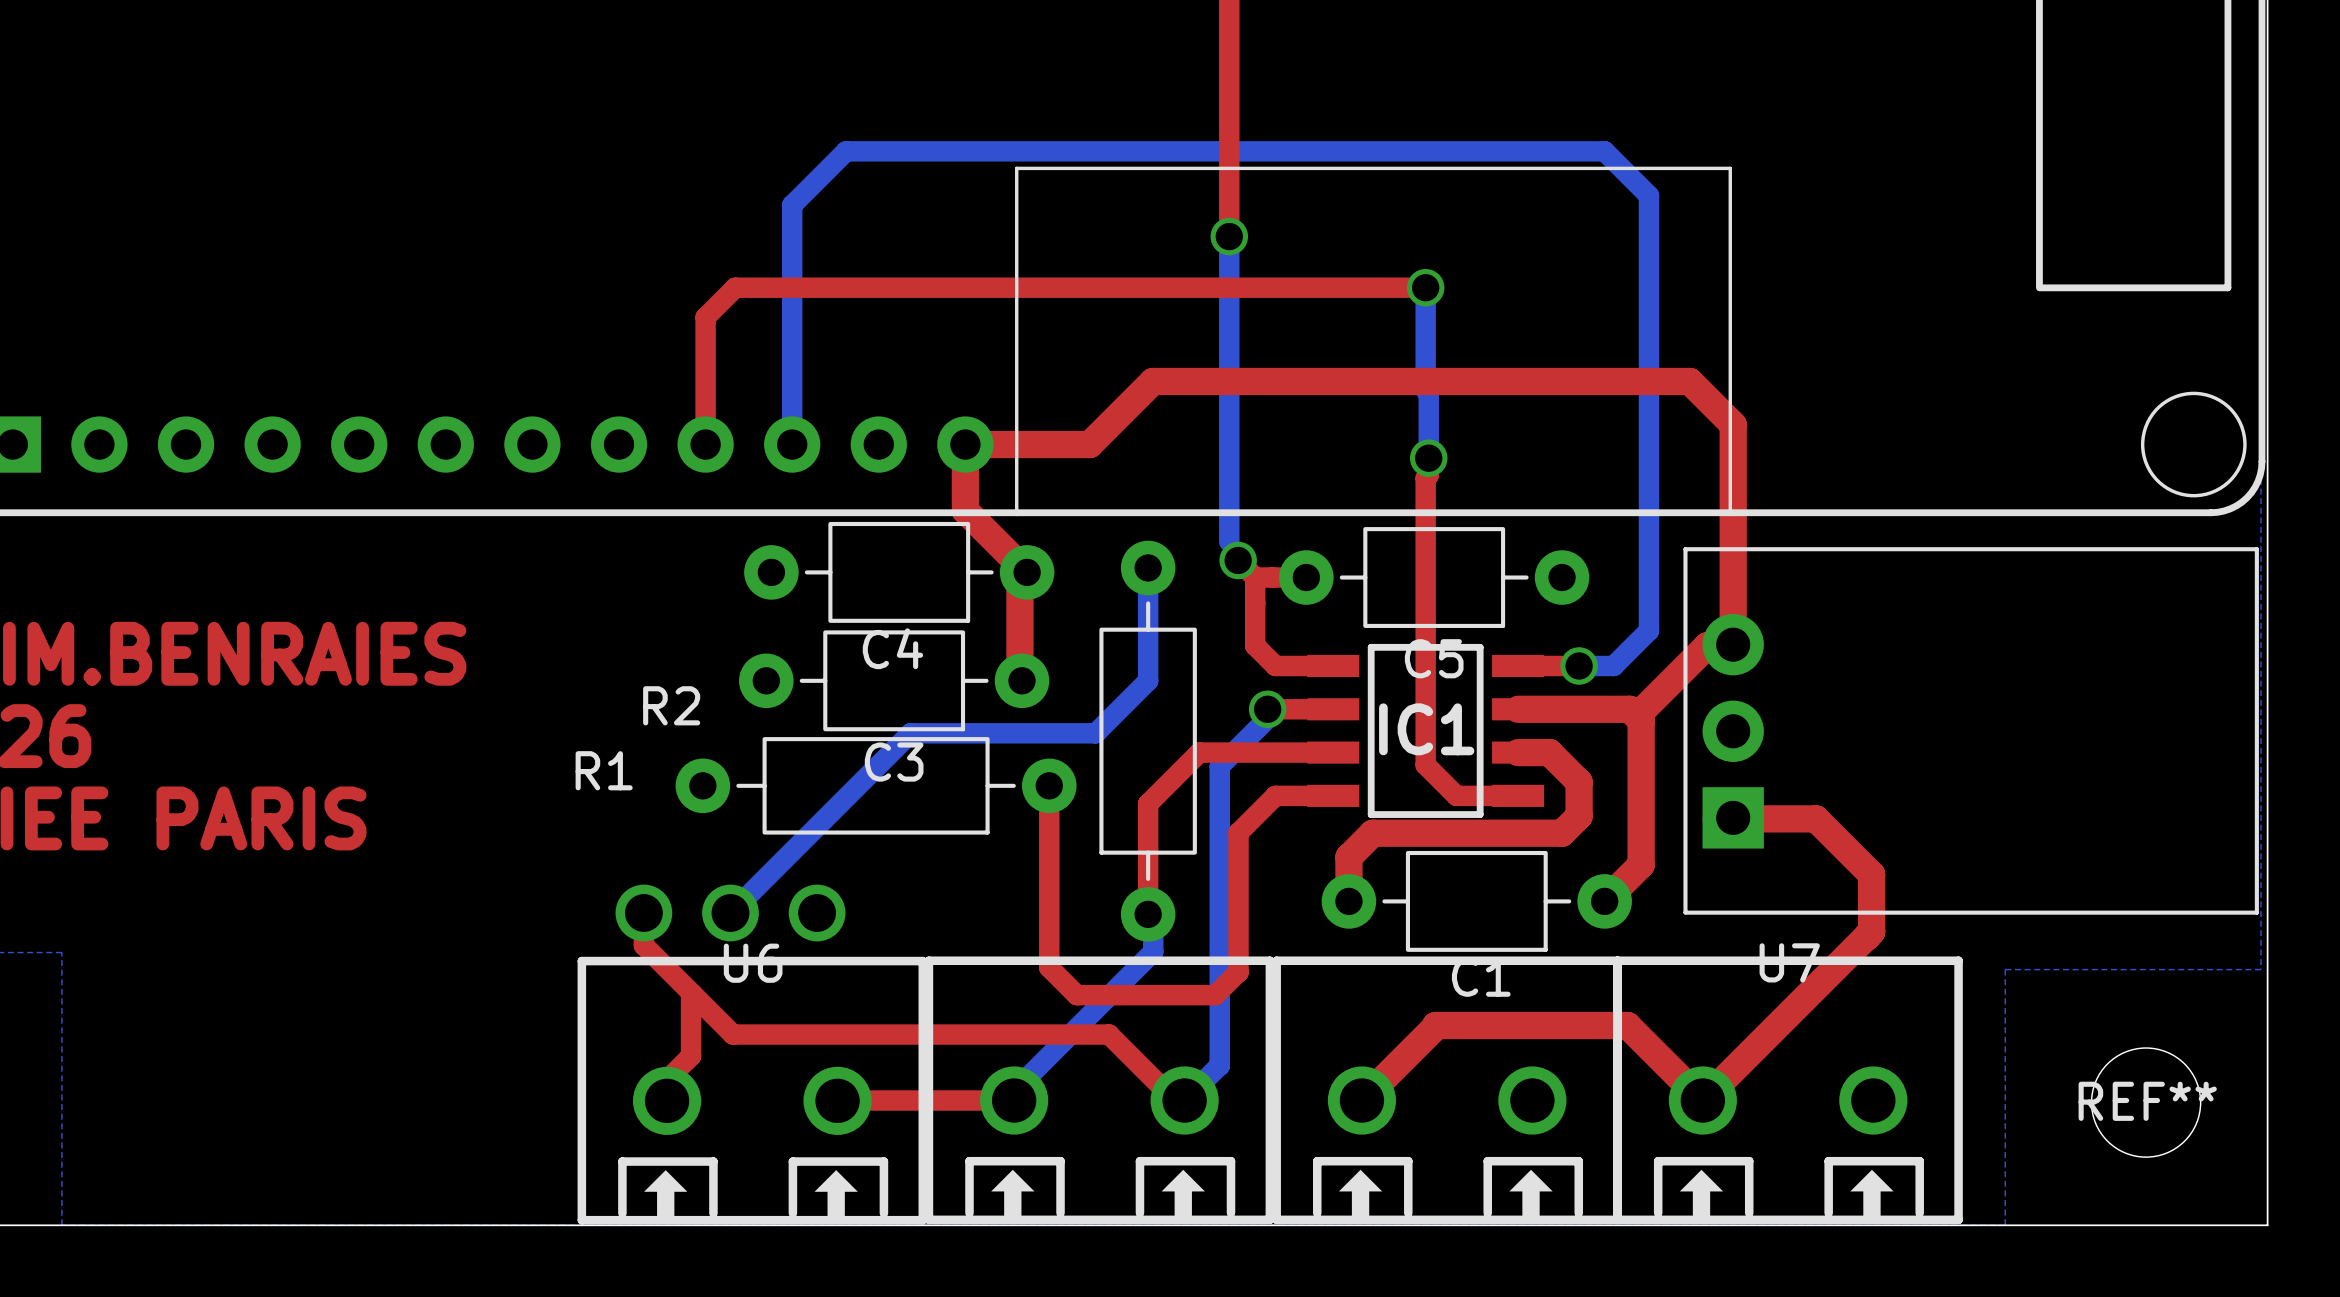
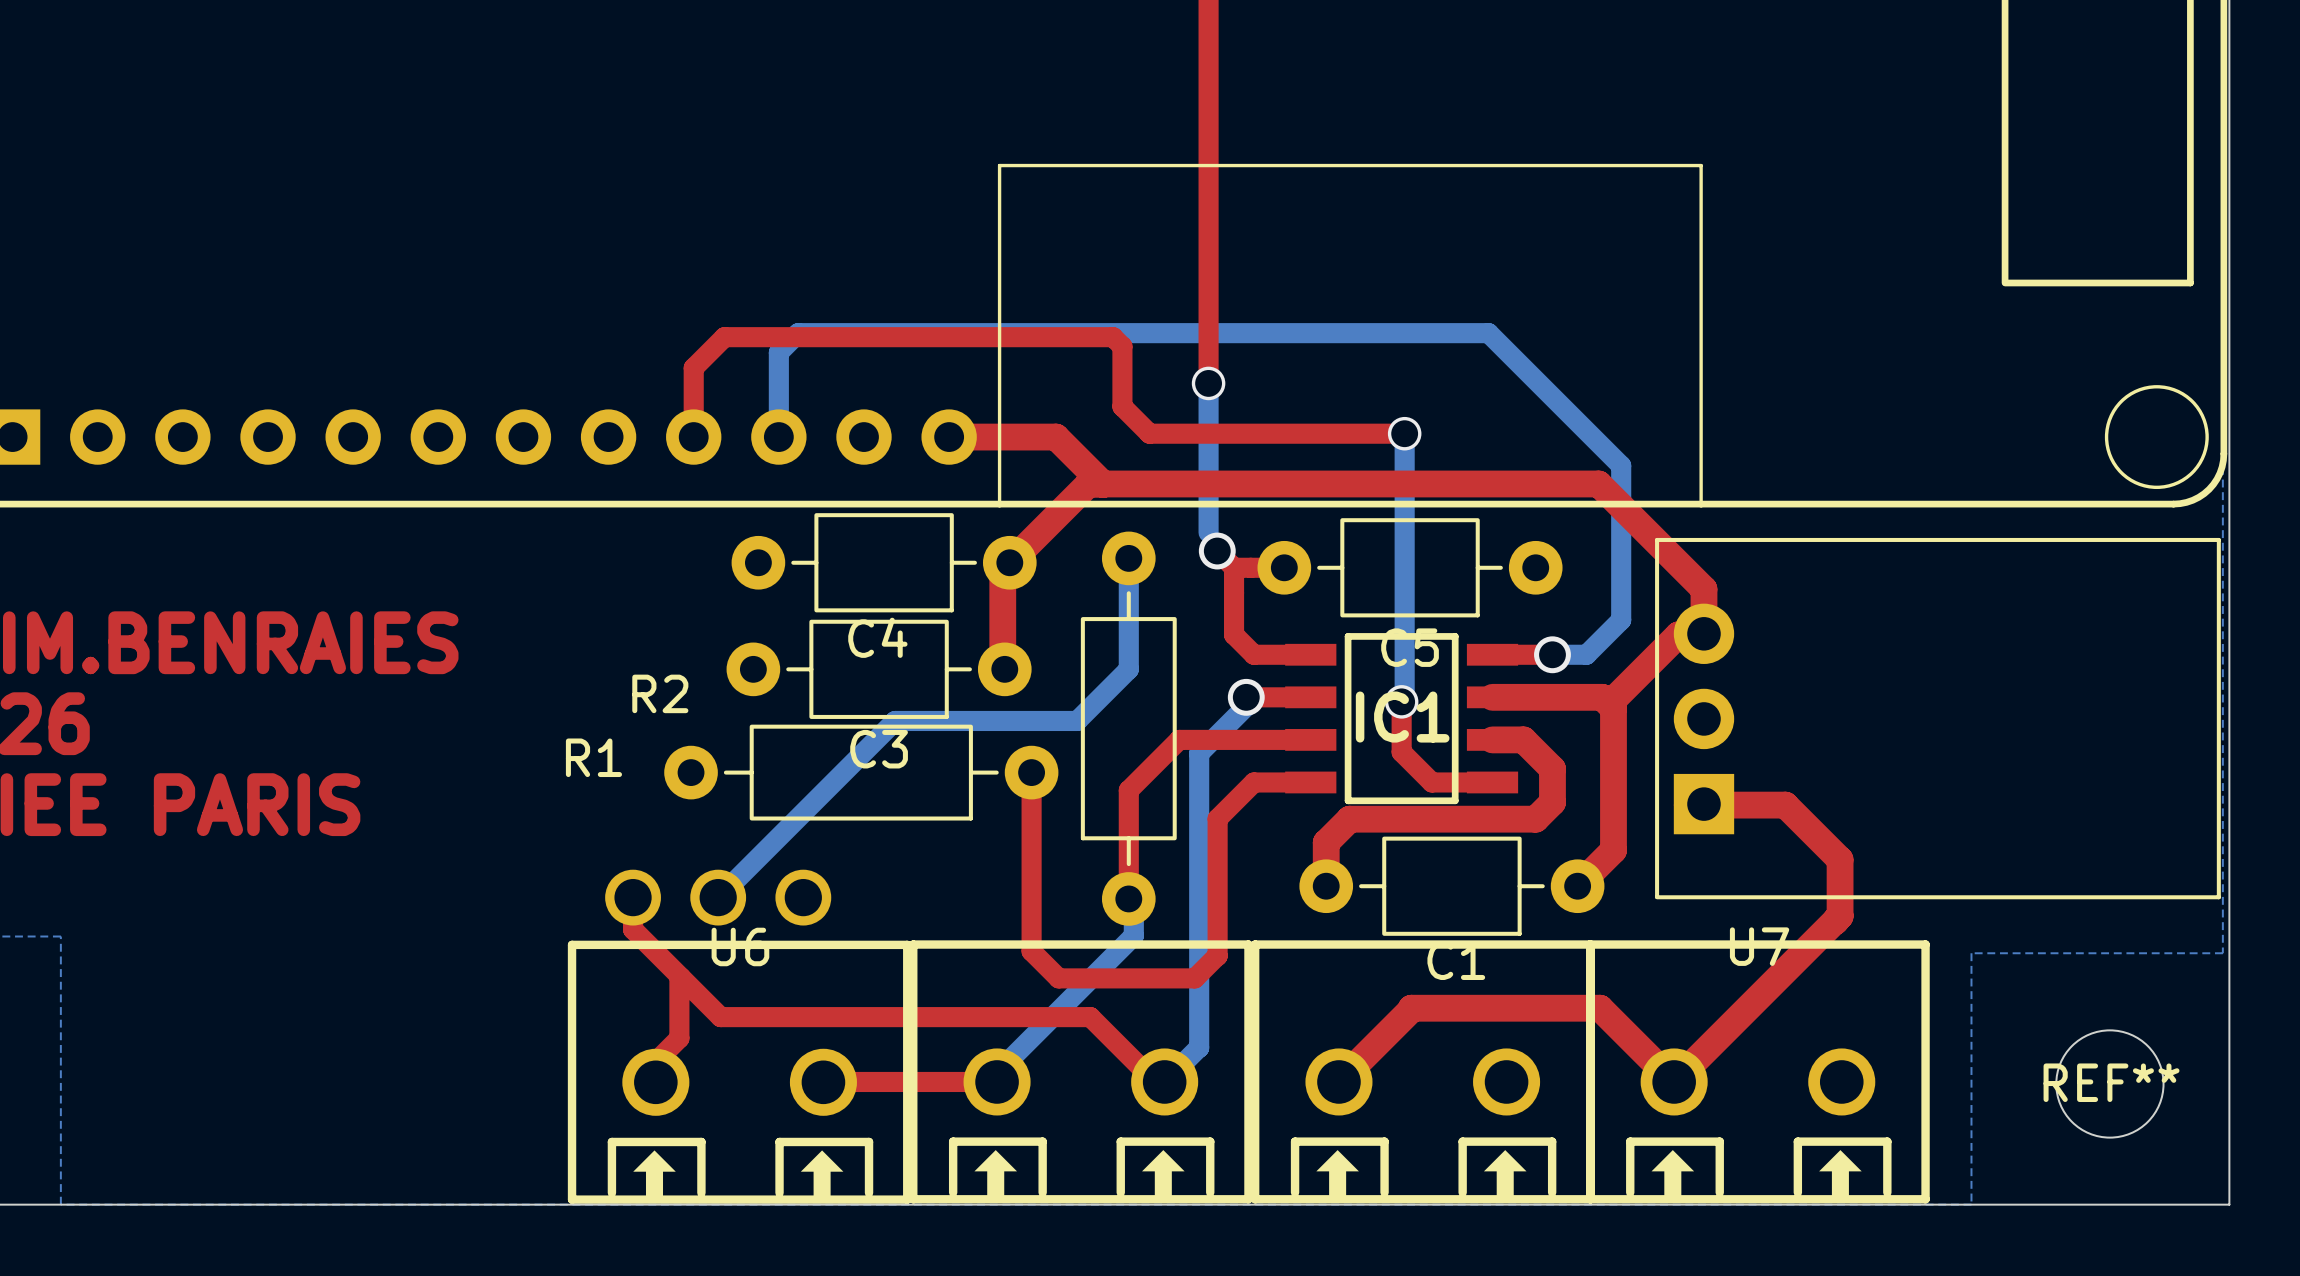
top track: none -> (1208, 232) (1208, 383)
bottom track: (1229, 236) (1229, 390) -> none
via: (1229, 236) -> none
top track: (1425, 287) (735, 287) (705, 317) (705, 374) -> (1404, 433) (1149, 433) (1122, 406) (1122, 346) (1113, 337) (724, 337) (693, 368)
bottom track: (1425, 287) (1425, 390) (1428, 393) (1428, 441) -> none
via: (1425, 287) -> none
bottom track: (792, 358) (792, 205) (846, 151) (1604, 151) (1648, 195) (1648, 473) -> (778, 352) (798, 333) (1488, 333) (1621, 465)
via: none -> (1208, 383)
top track: (965, 444) (965, 510) (1027, 572) -> (1056, 437) (1103, 484) (1088, 484) (1009, 562)
top track: (1074, 444) (1089, 444) (1152, 381) (1689, 381) (1733, 424) (1733, 599) -> (1103, 483) (1598, 483) (1703, 589)
top track: (1428, 458) (1428, 475) (1425, 478) (1425, 713) -> none
bottom track: none -> (1404, 450) (1404, 698) (1401, 701)
via position: (1428, 458) -> (1404, 433)
via: none -> (1401, 701)

